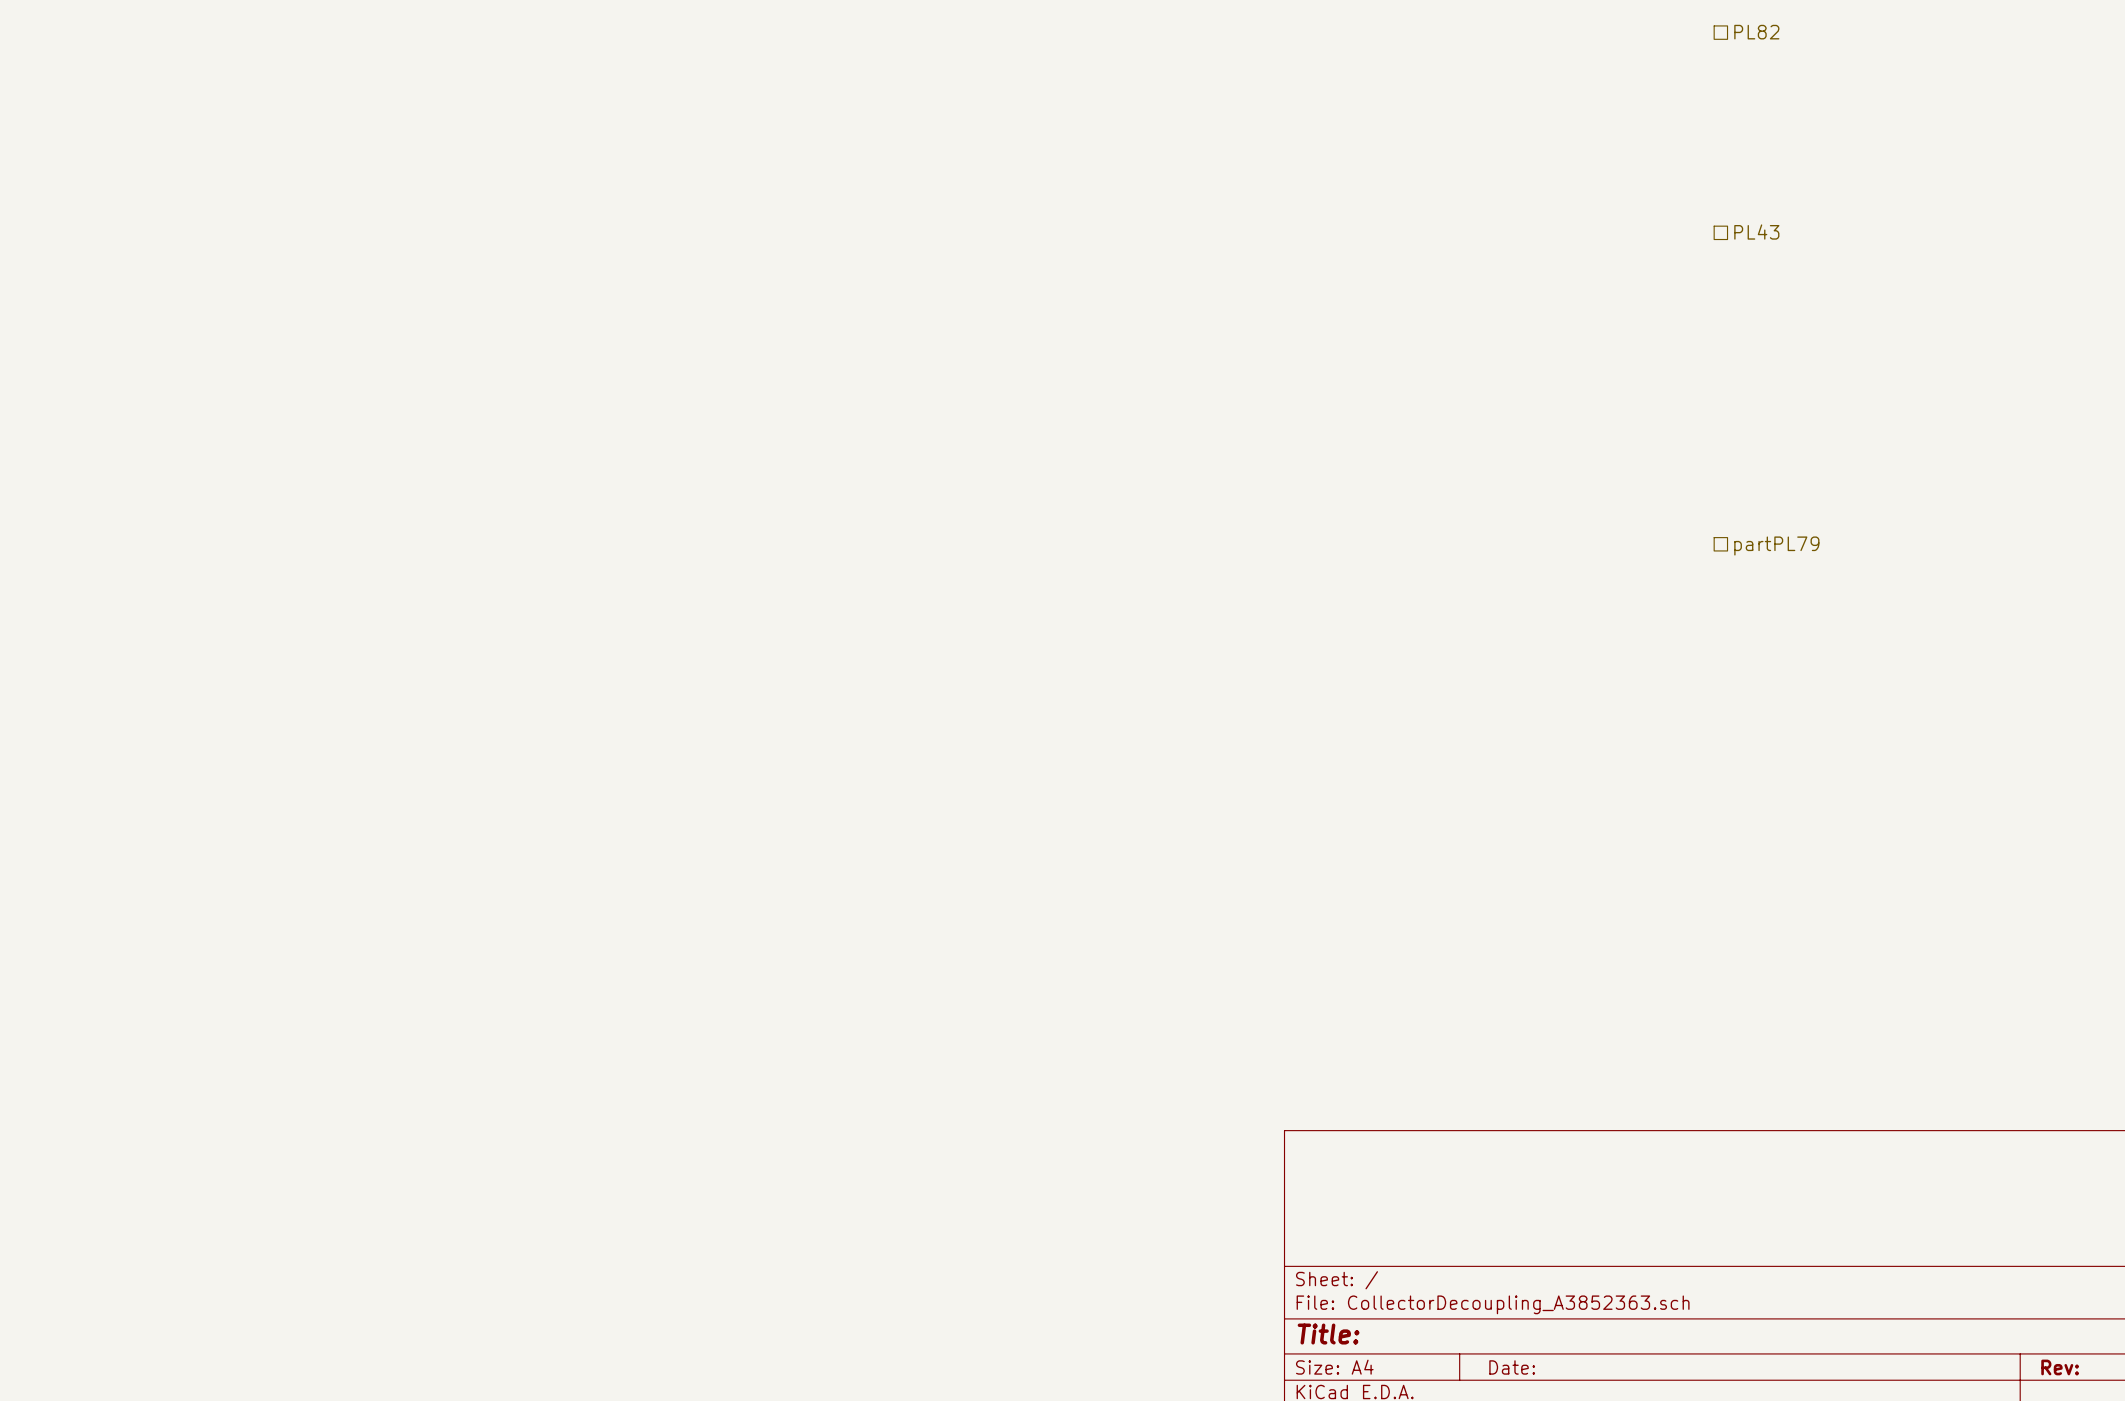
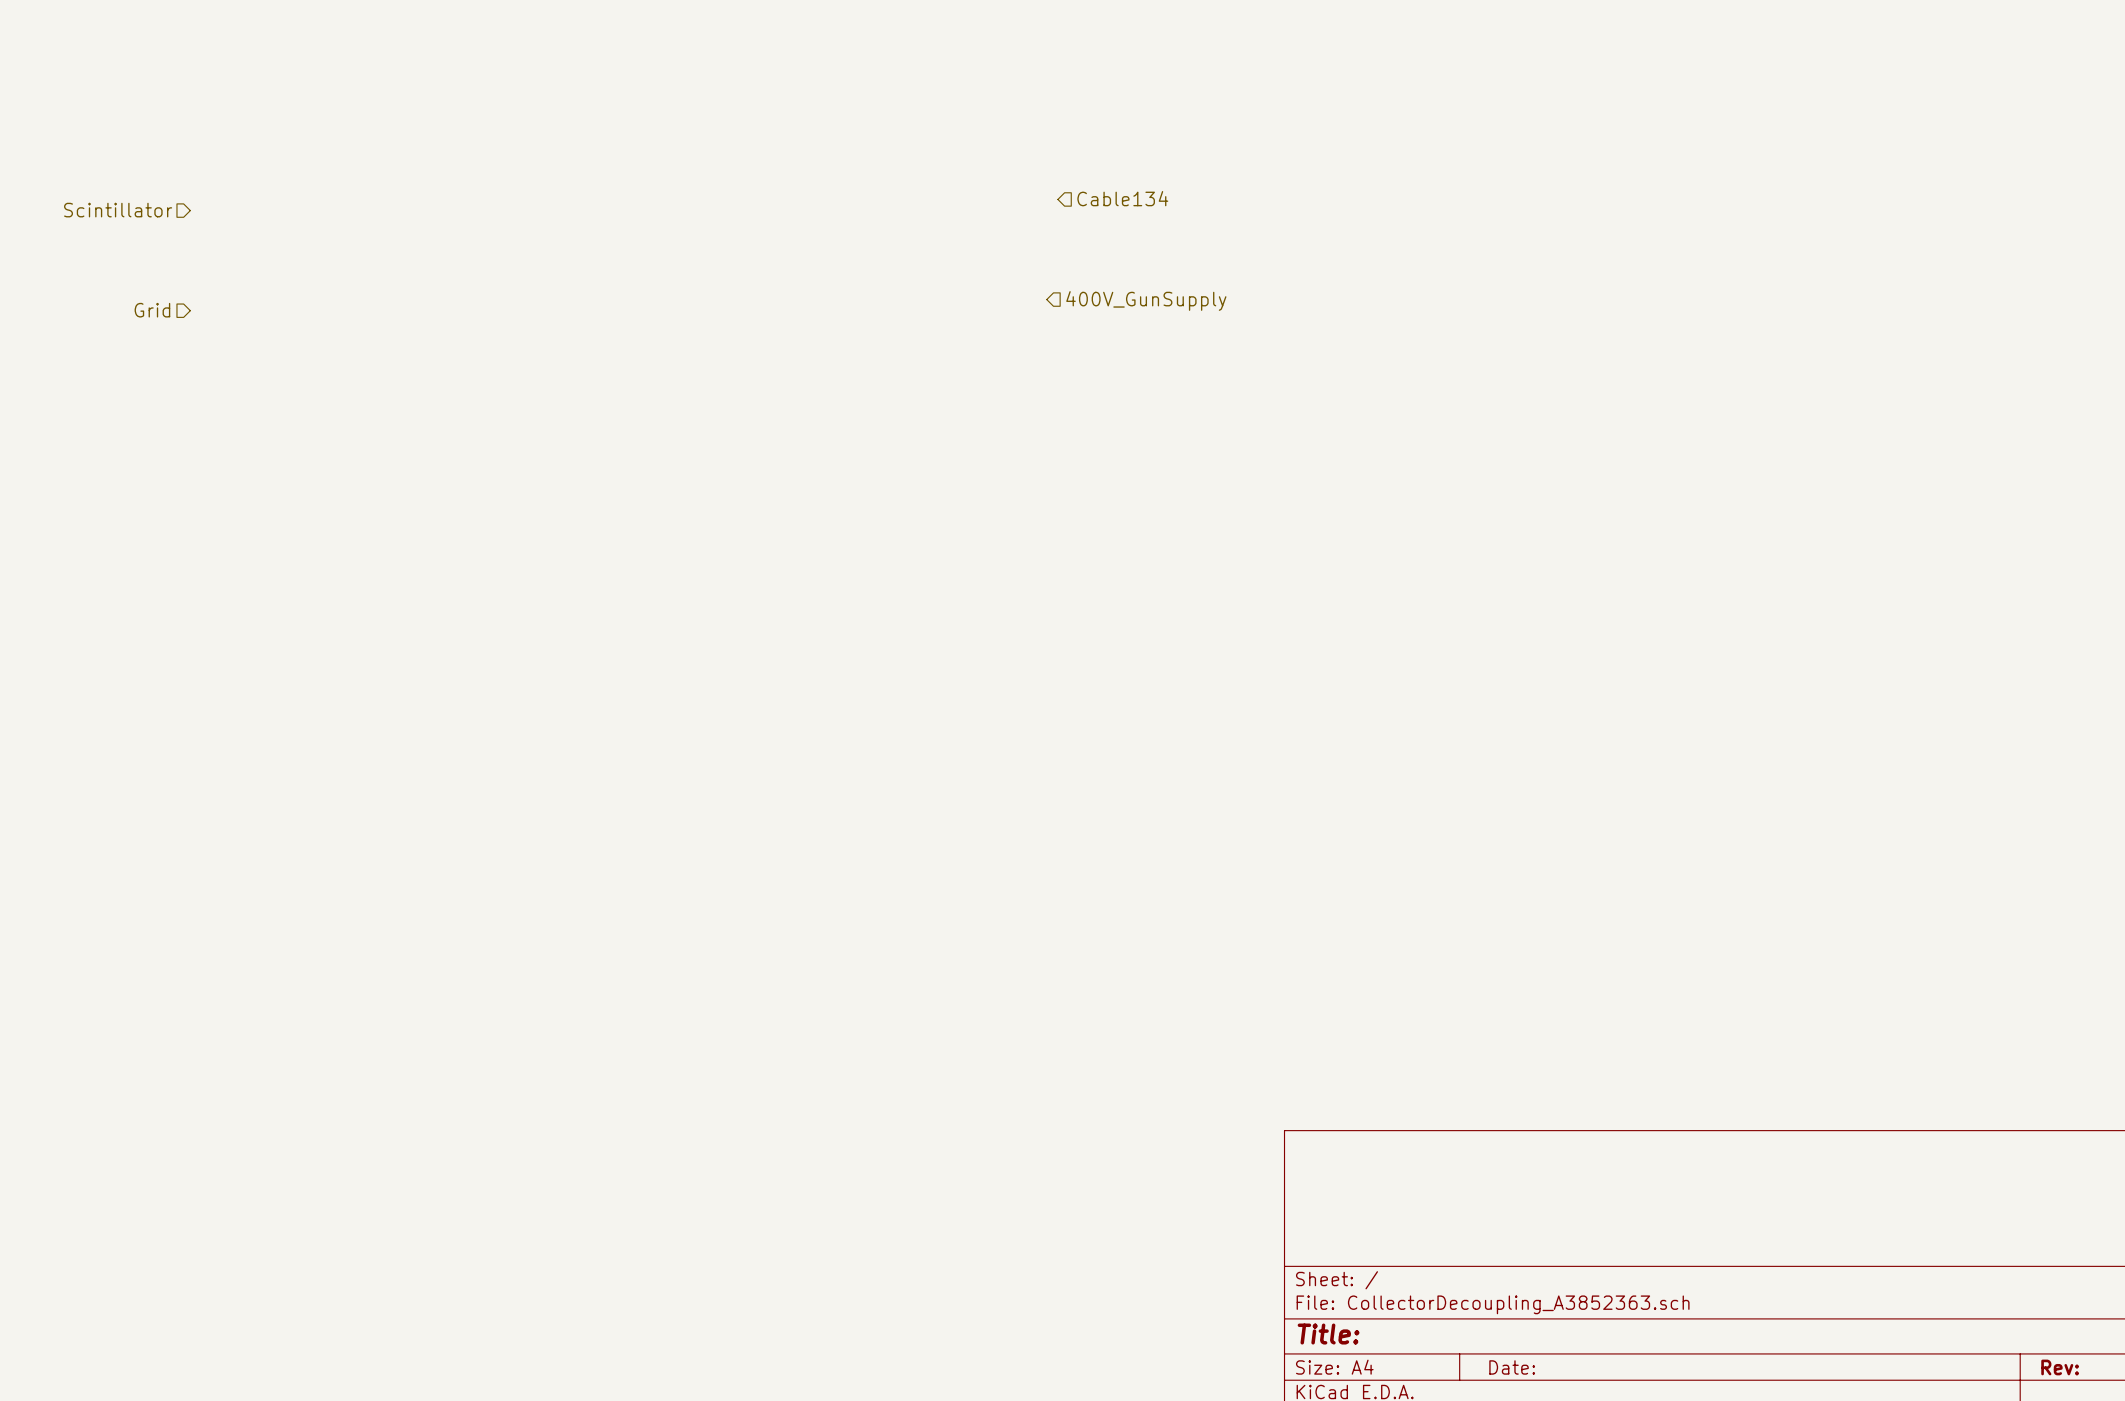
hierarchical label: PL82 (1756, 32) -> none
hierarchical label: none -> Cable134 (1122, 198)
hierarchical label: none -> Scintillator (118, 210)
hierarchical label: PL43 (1756, 232) -> none
hierarchical label: none -> 400V_GunSupply (1146, 300)
hierarchical label: none -> Grid (152, 310)
hierarchical label: partPL79 (1776, 546) -> none

